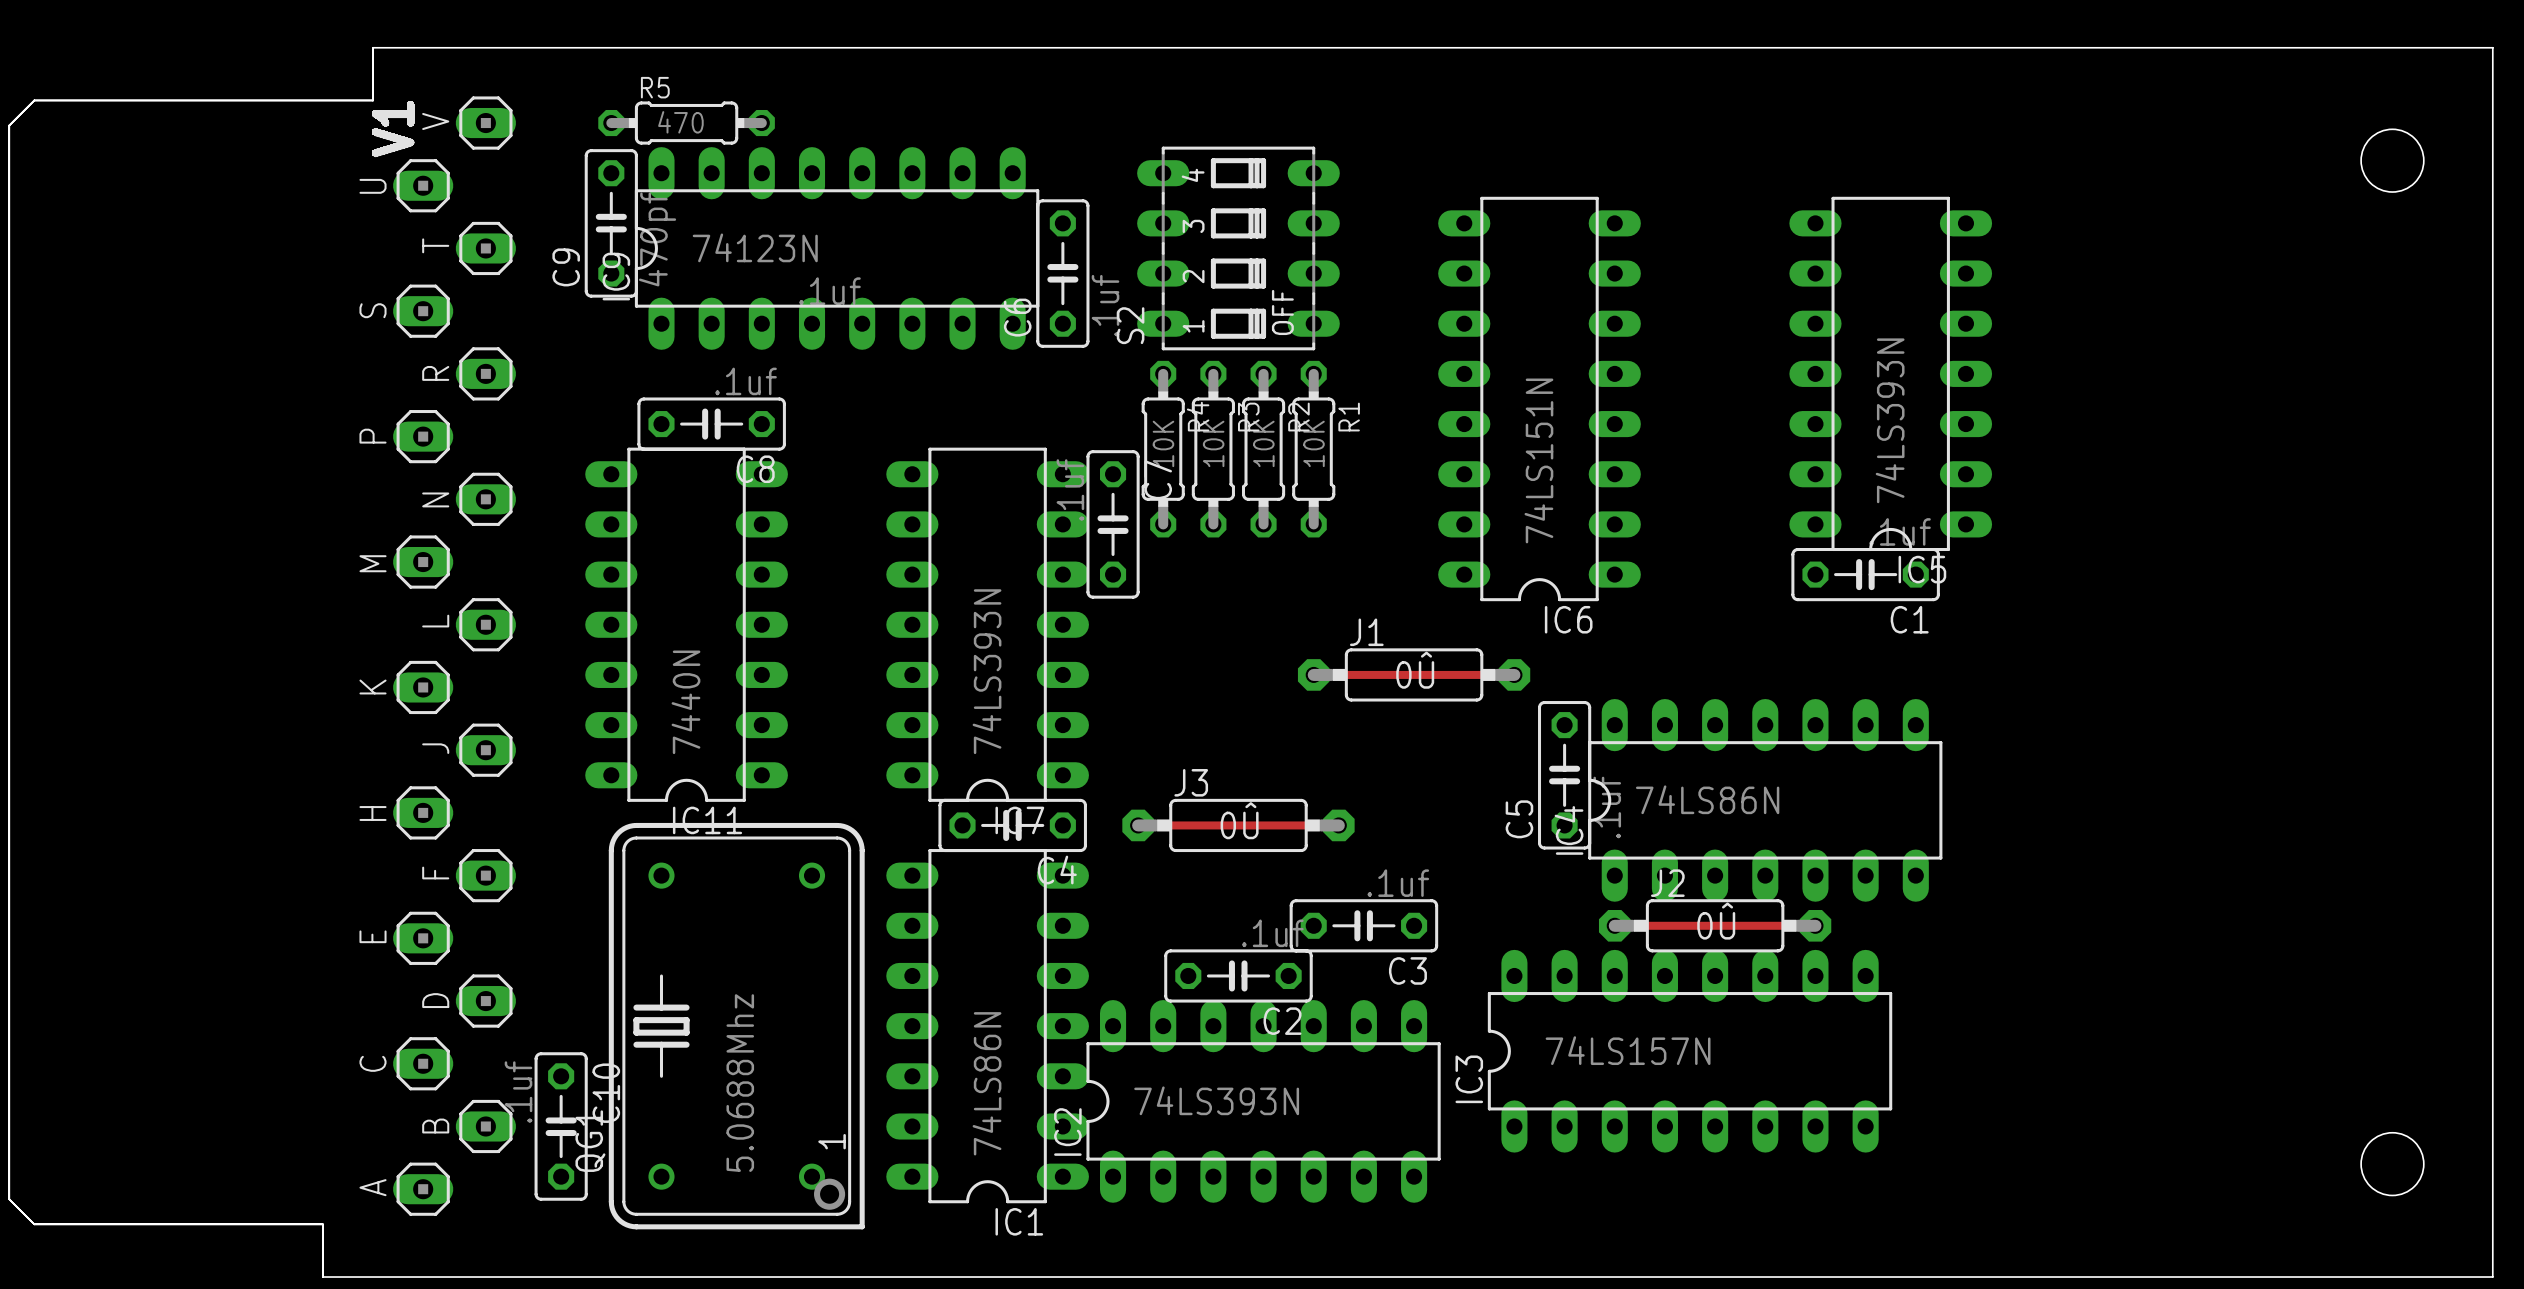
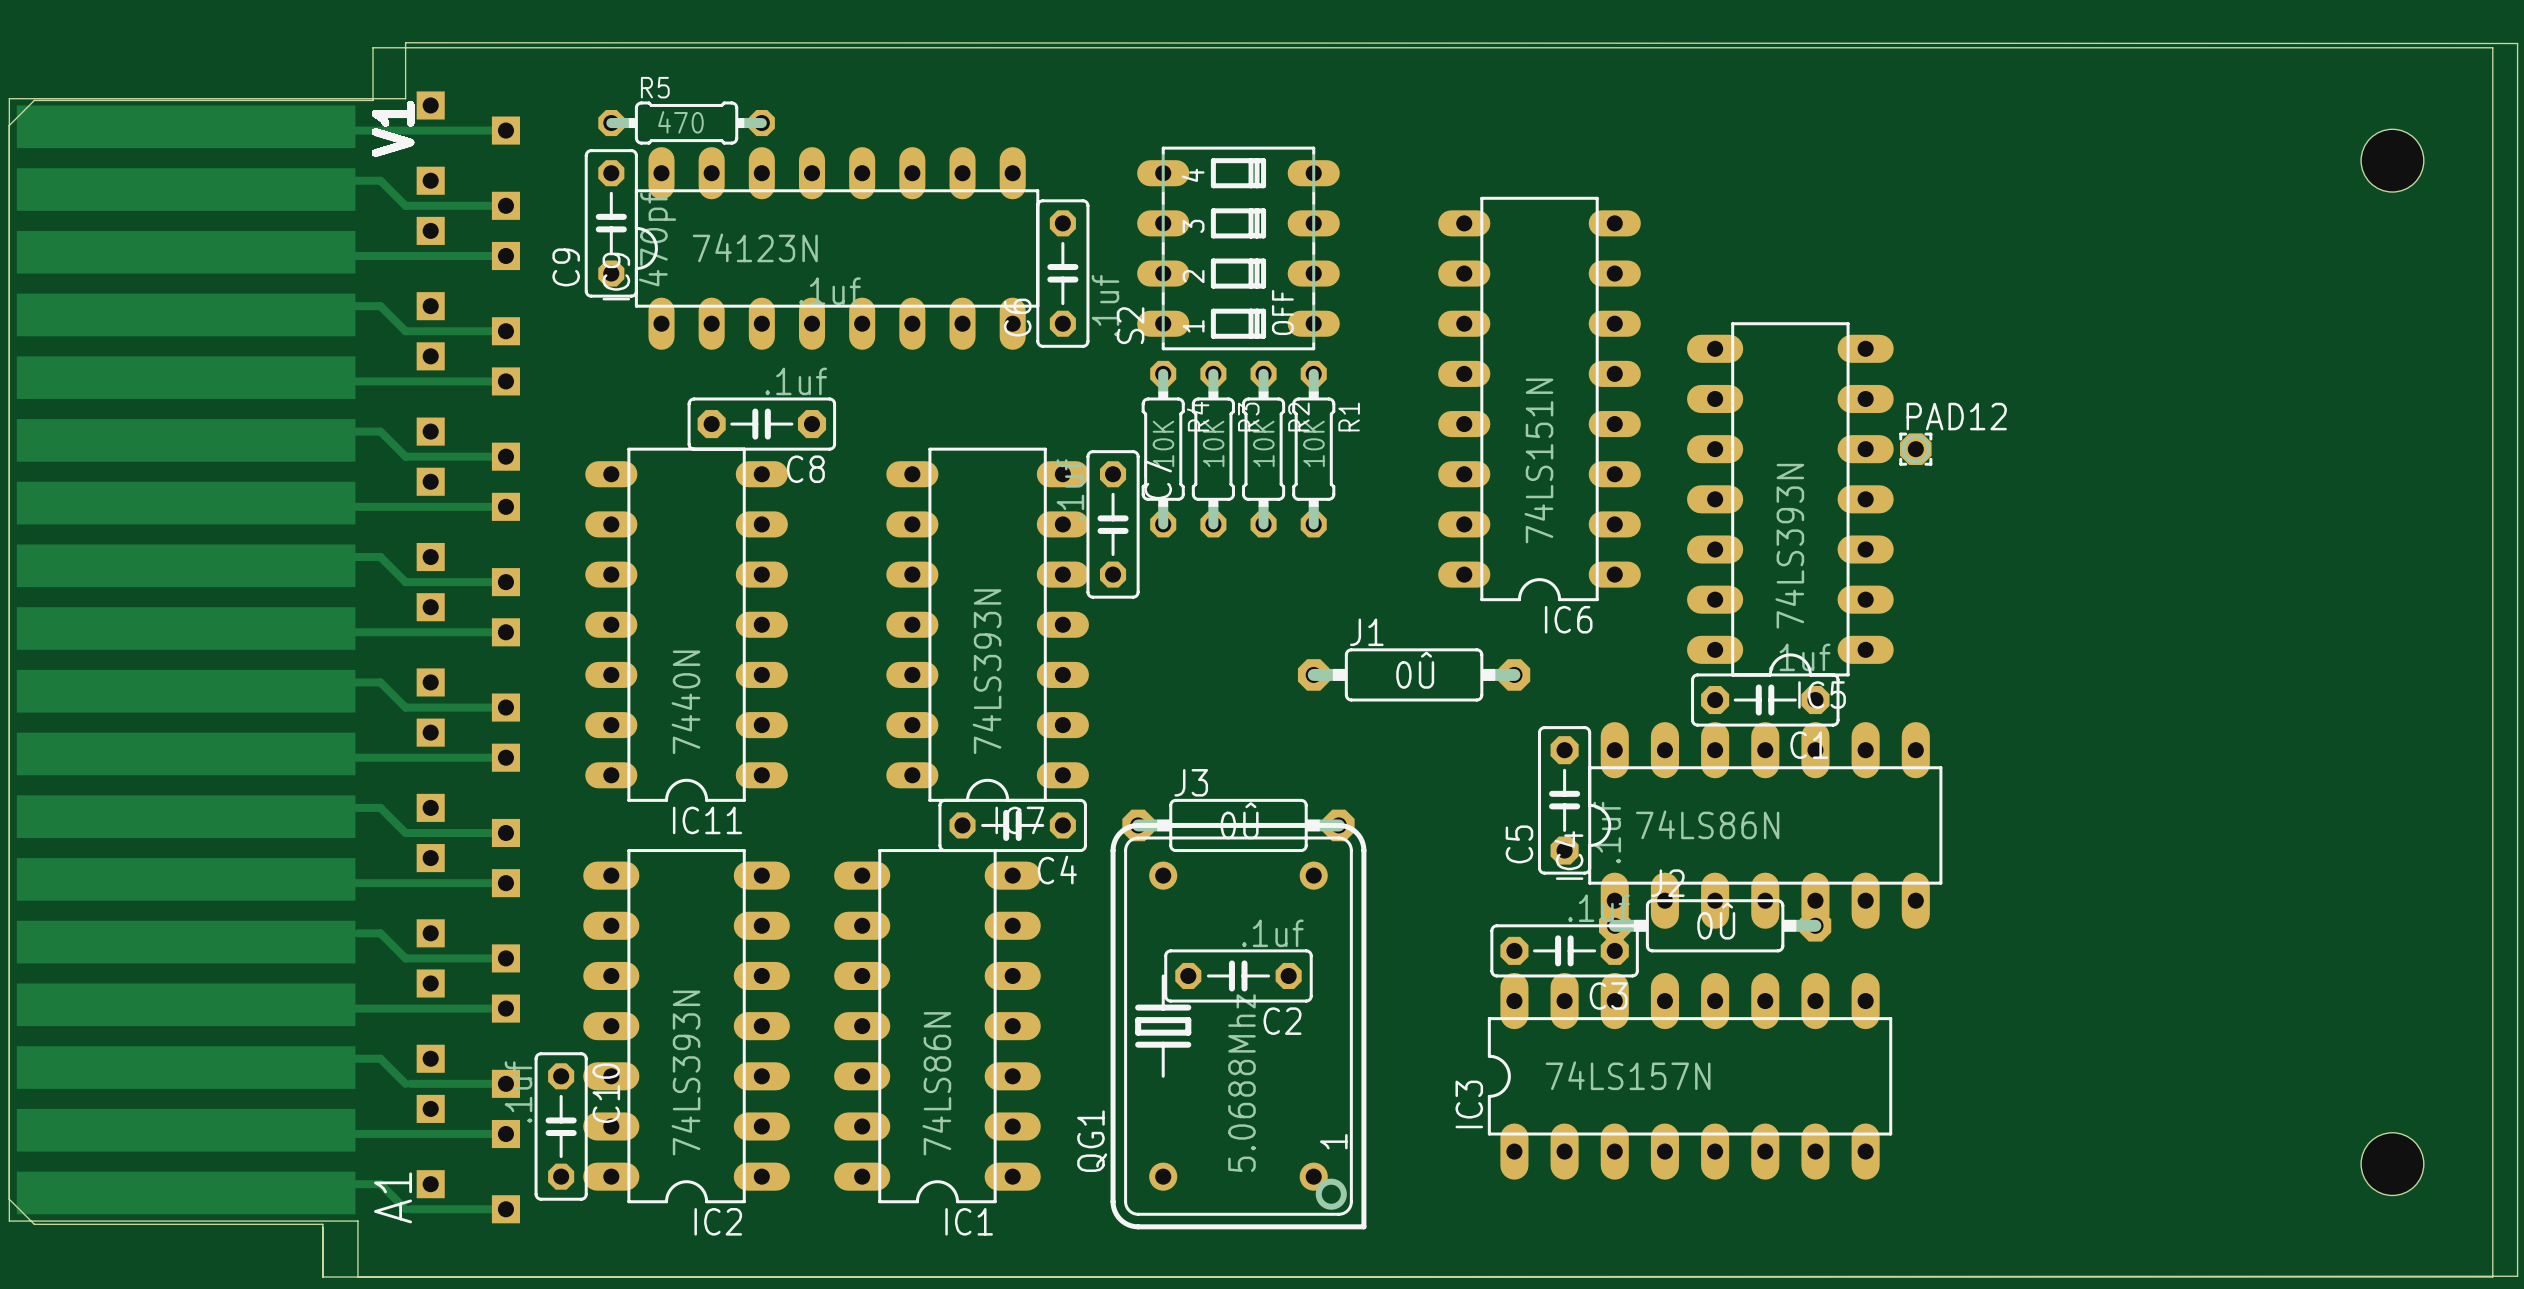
board edge: none -> (405, 42) (2517, 43) (2517, 1276) (357, 1277) (357, 1221) (9, 1221) (9, 98) (405, 98) (405, 42)
IC5 footprint: [1789, 196, 1993, 552] -> [1687, 322, 1894, 677]
C8 footprint: [637, 397, 786, 451] -> [687, 397, 837, 451]
PAD12: none -> (1915, 449)
C1 footprint: [1791, 547, 1940, 602] -> [1691, 673, 1840, 727]
part: (454, 656) -> none
part: none -> (268, 657)
part: (191, 663) -> none
track: (1313, 674) (1514, 674) -> none
IC4 footprint: [1588, 699, 1943, 902] -> [1588, 722, 1943, 929]
C5 footprint: [1538, 701, 1592, 850] -> [1538, 726, 1592, 875]
QG1 footprint: [608, 822, 865, 1230] -> [1110, 822, 1367, 1230]
track: (1138, 825) (1338, 825) -> none
IC1 footprint: [886, 849, 1089, 1204] -> [834, 849, 1041, 1204]
C3 footprint: [1289, 899, 1439, 953] -> [1490, 924, 1639, 978]
track: (1614, 925) (1815, 925) -> none
IC3 footprint: [1487, 949, 1893, 1153] -> [1487, 972, 1893, 1180]
IC2 footprint: [1086, 1000, 1441, 1203] -> [583, 849, 790, 1204]
IC2 value position: 74LS393N (1216, 1100) -> 74LS393N (685, 1073)
IC2 name position: IC2 (1067, 1132) -> IC2 (718, 1221)
text: none -> A1 (393, 1197)

